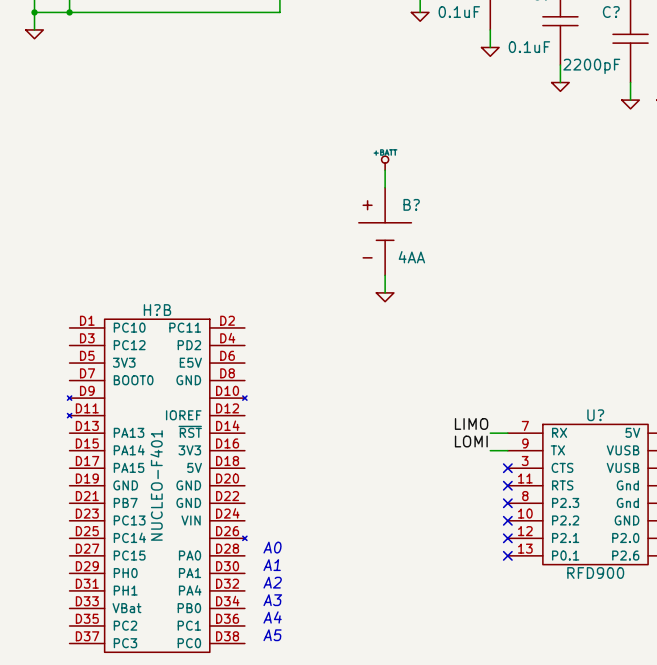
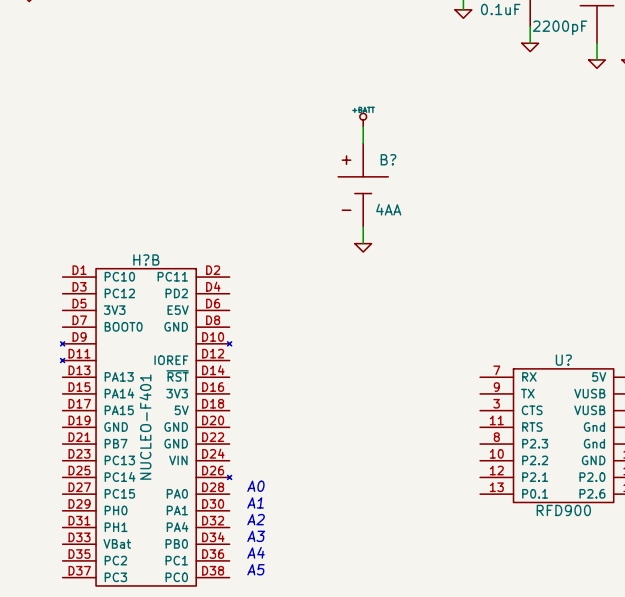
label: LIMO (471, 423) -> none
wire: (490, 433) (507, 433) -> none
label: LOMI (471, 441) -> none
wire: (490, 450) (507, 450) -> none
no-connect mark: (507, 468) -> none
no-connect mark: (507, 485) -> none
no-connect mark: (507, 503) -> none
no-connect mark: (507, 520) -> none
no-connect mark: (507, 538) -> none
no-connect mark: (507, 555) -> none

